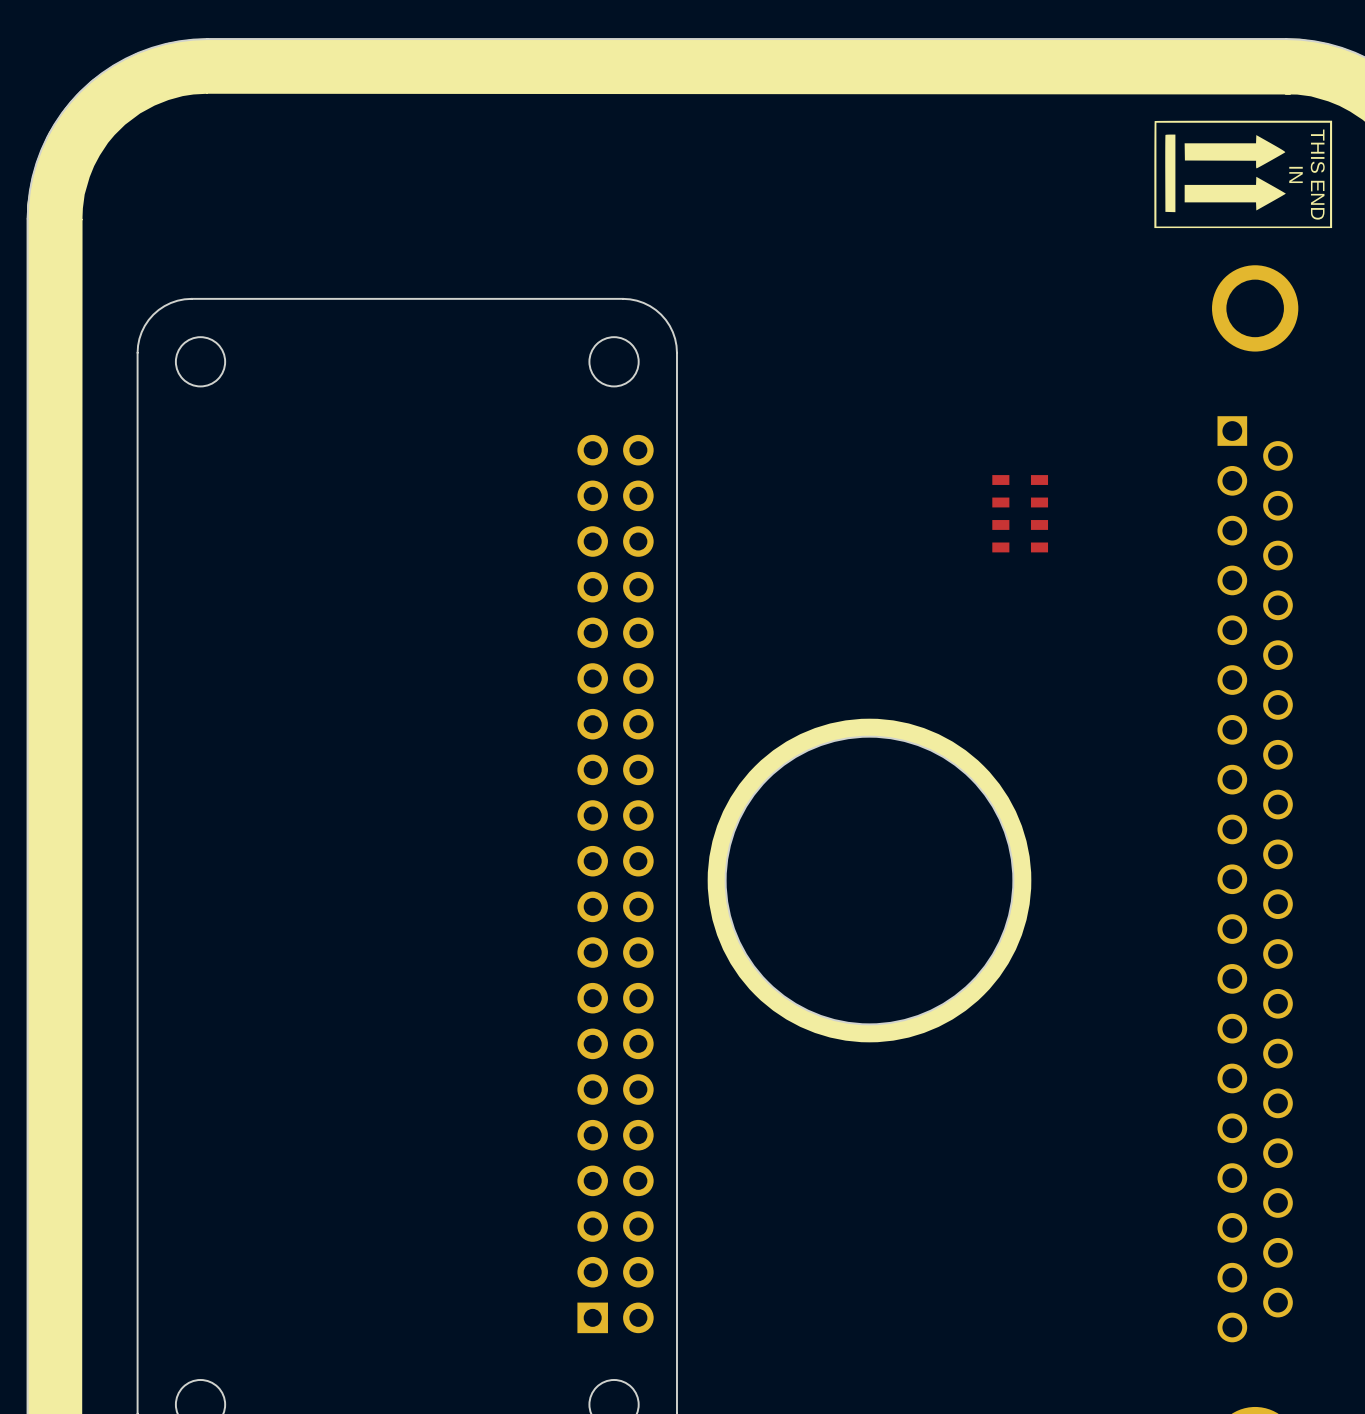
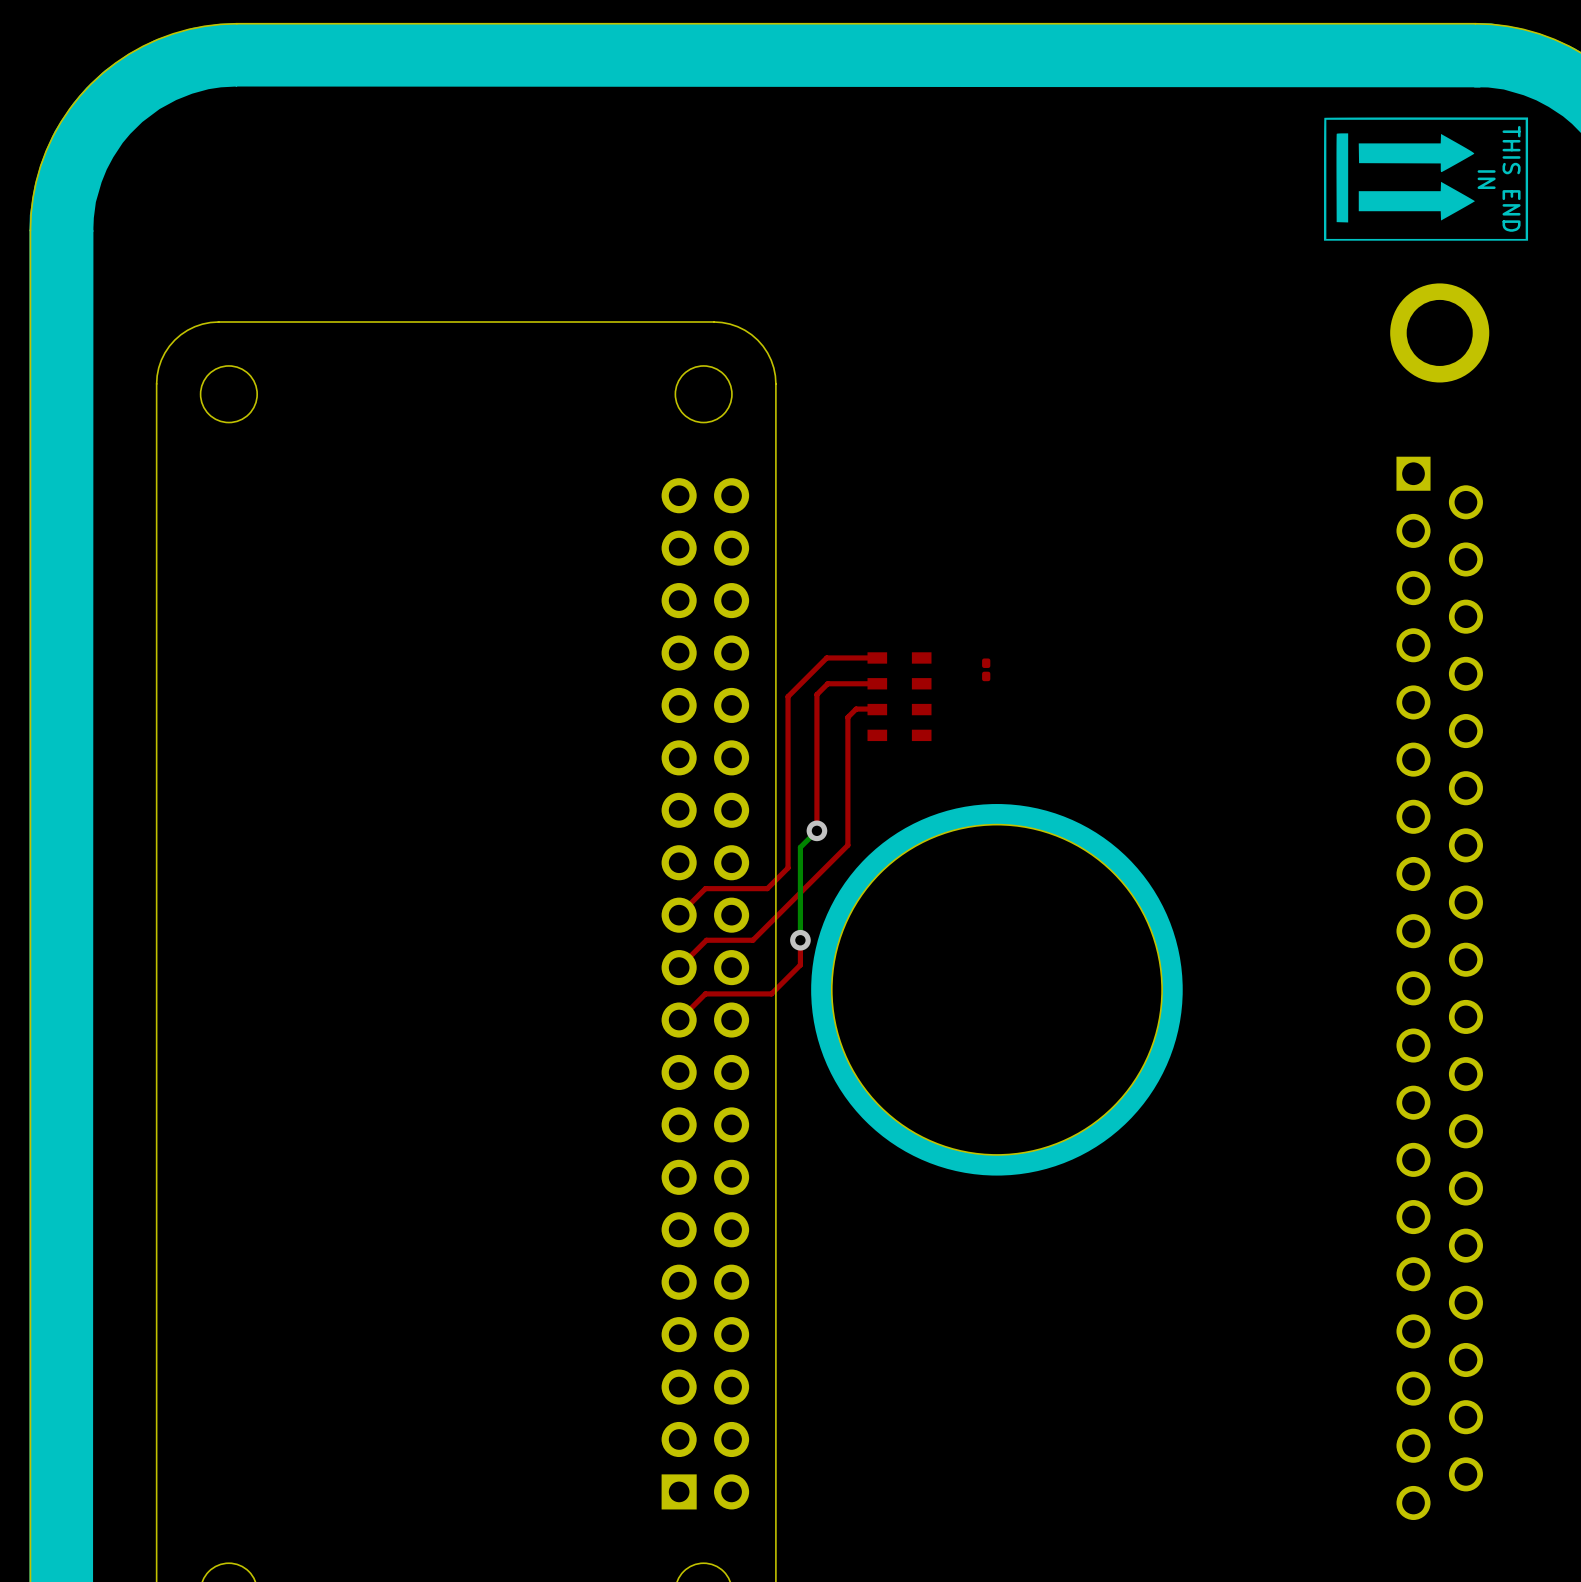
part position: (1020, 513) -> (899, 696)
top track: none -> (877, 657) (826, 657) (788, 696) (788, 868) (767, 888) (705, 888) (679, 914)
part: none -> (986, 669)
top track: none -> (877, 683) (827, 683) (816, 694) (816, 830)
top track: none -> (877, 709) (856, 709) (847, 717) (847, 845) (752, 940) (706, 940) (679, 967)
bottom track: none -> (816, 830) (800, 847) (800, 940)
via: none -> (816, 830)
top track: none -> (800, 940) (800, 965) (771, 993) (705, 993) (679, 1020)
via: none -> (800, 940)

